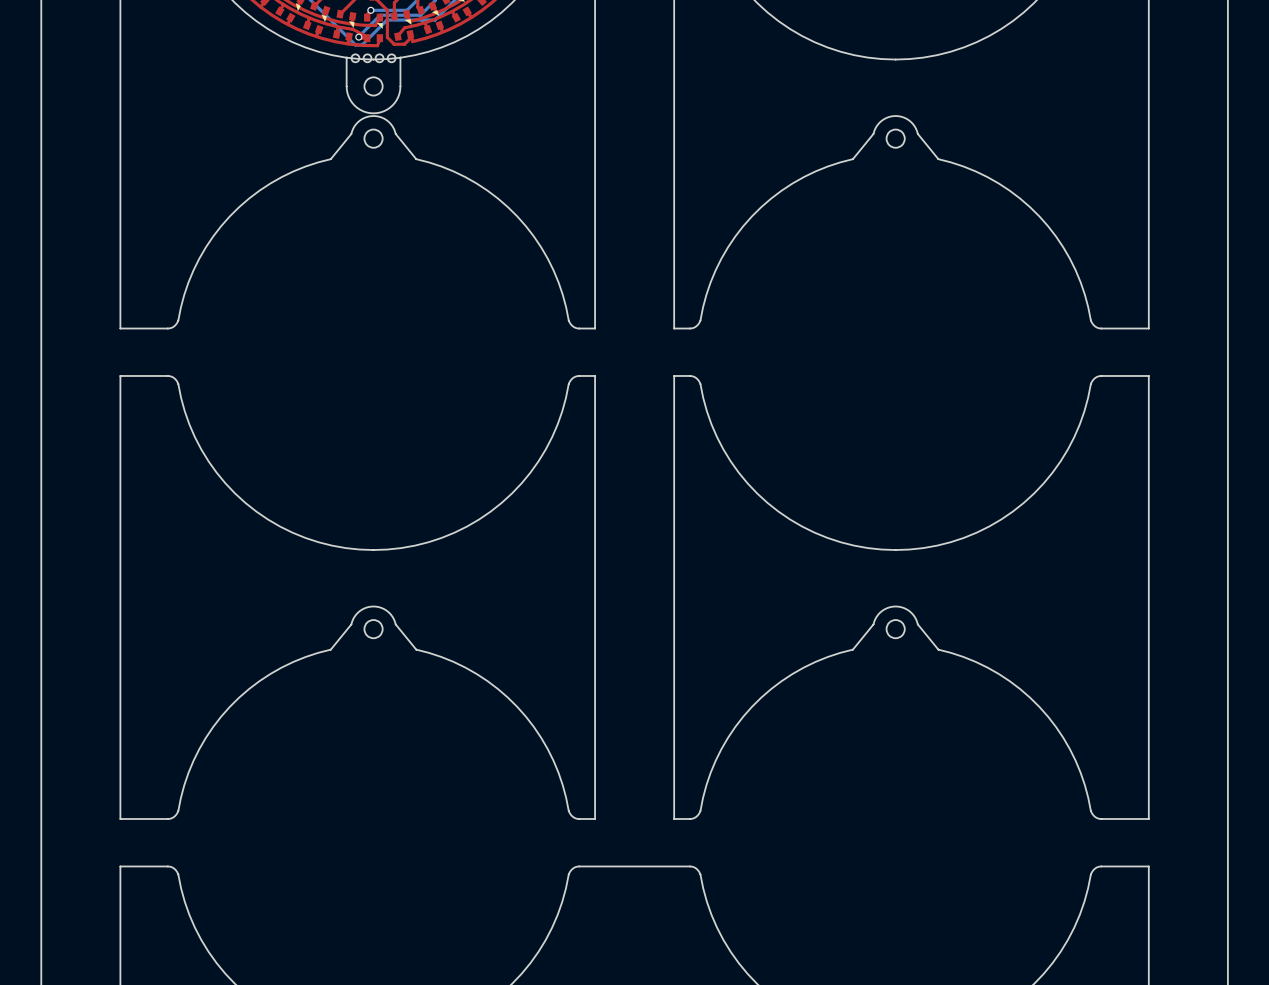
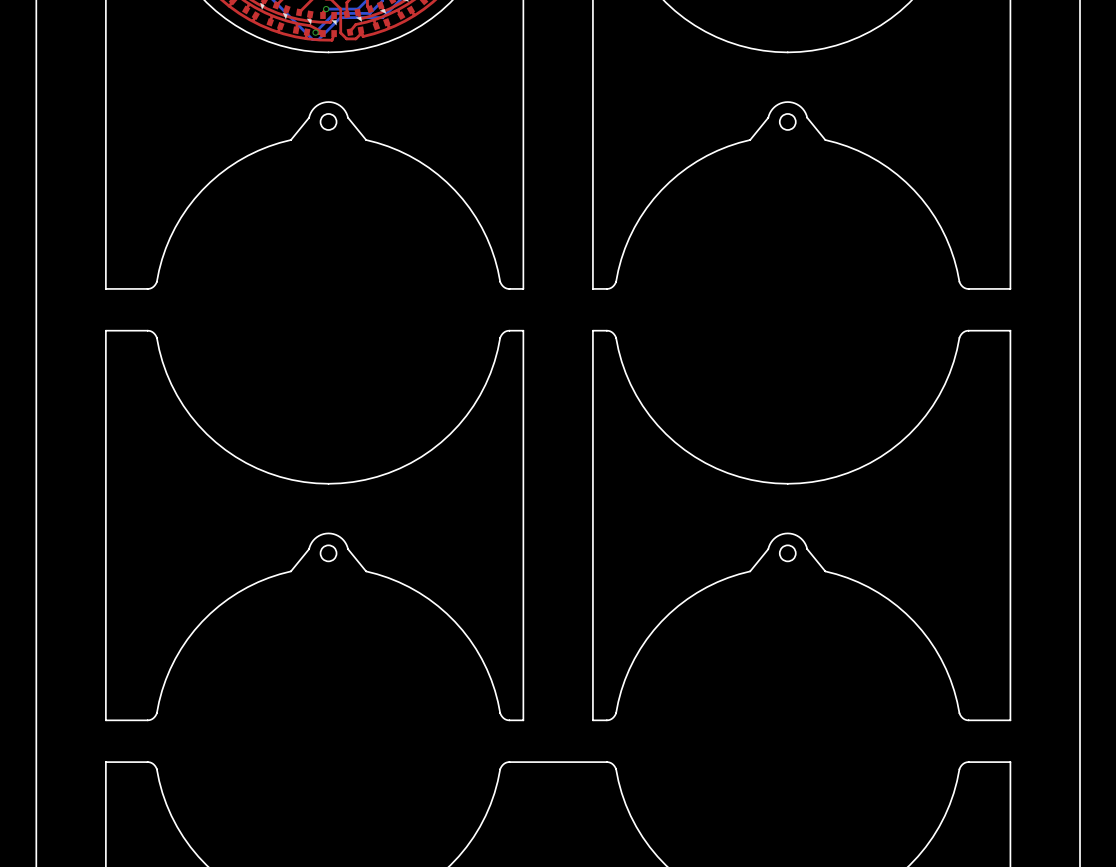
part: (373, 84) -> none

